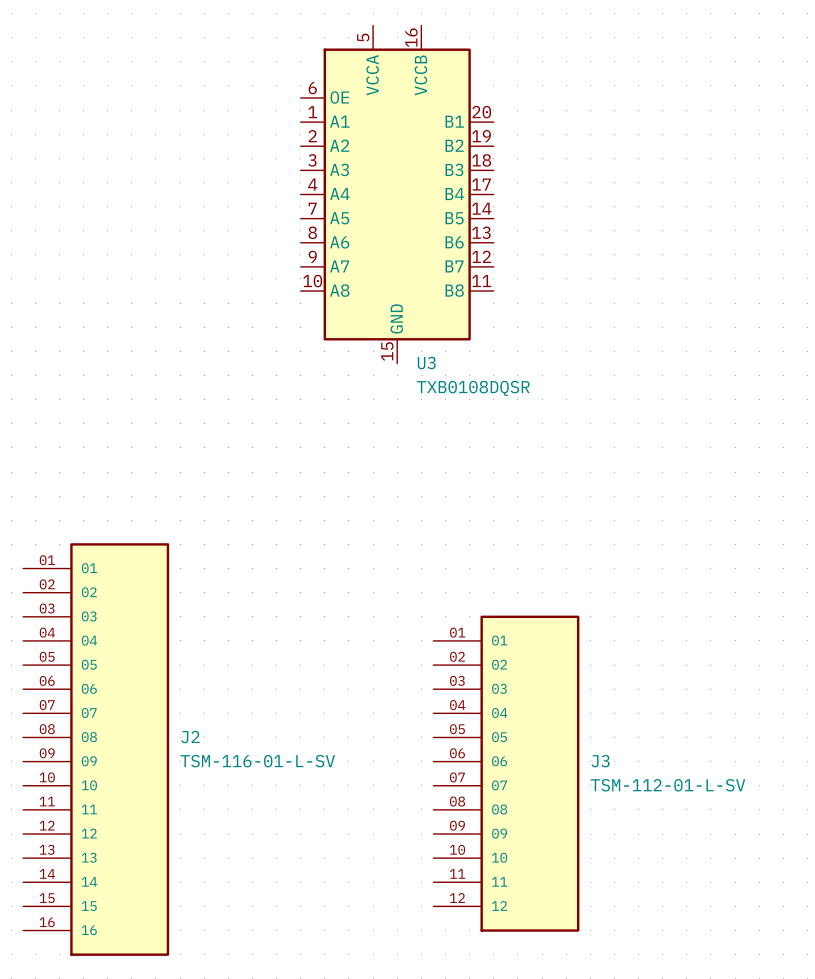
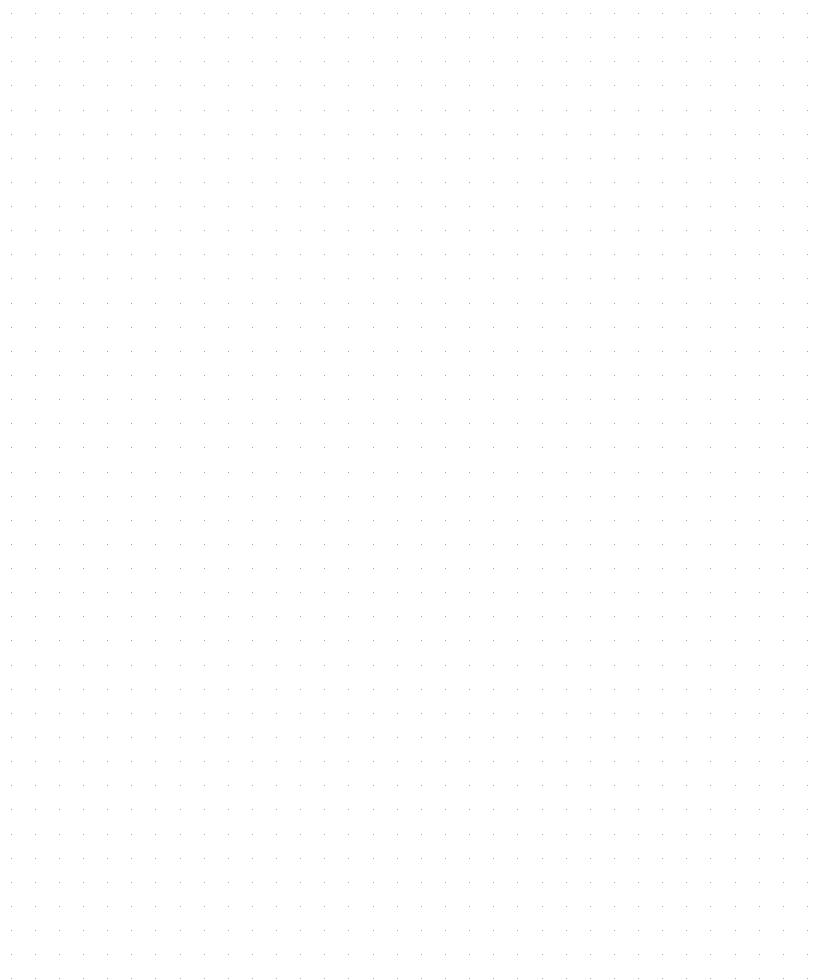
U3: TXB0108DQSR (397, 194) -> none
J2: TSM-116-01-L-SV (96, 749) -> none
J3: TSM-112-01-L-SV (506, 773) -> none

